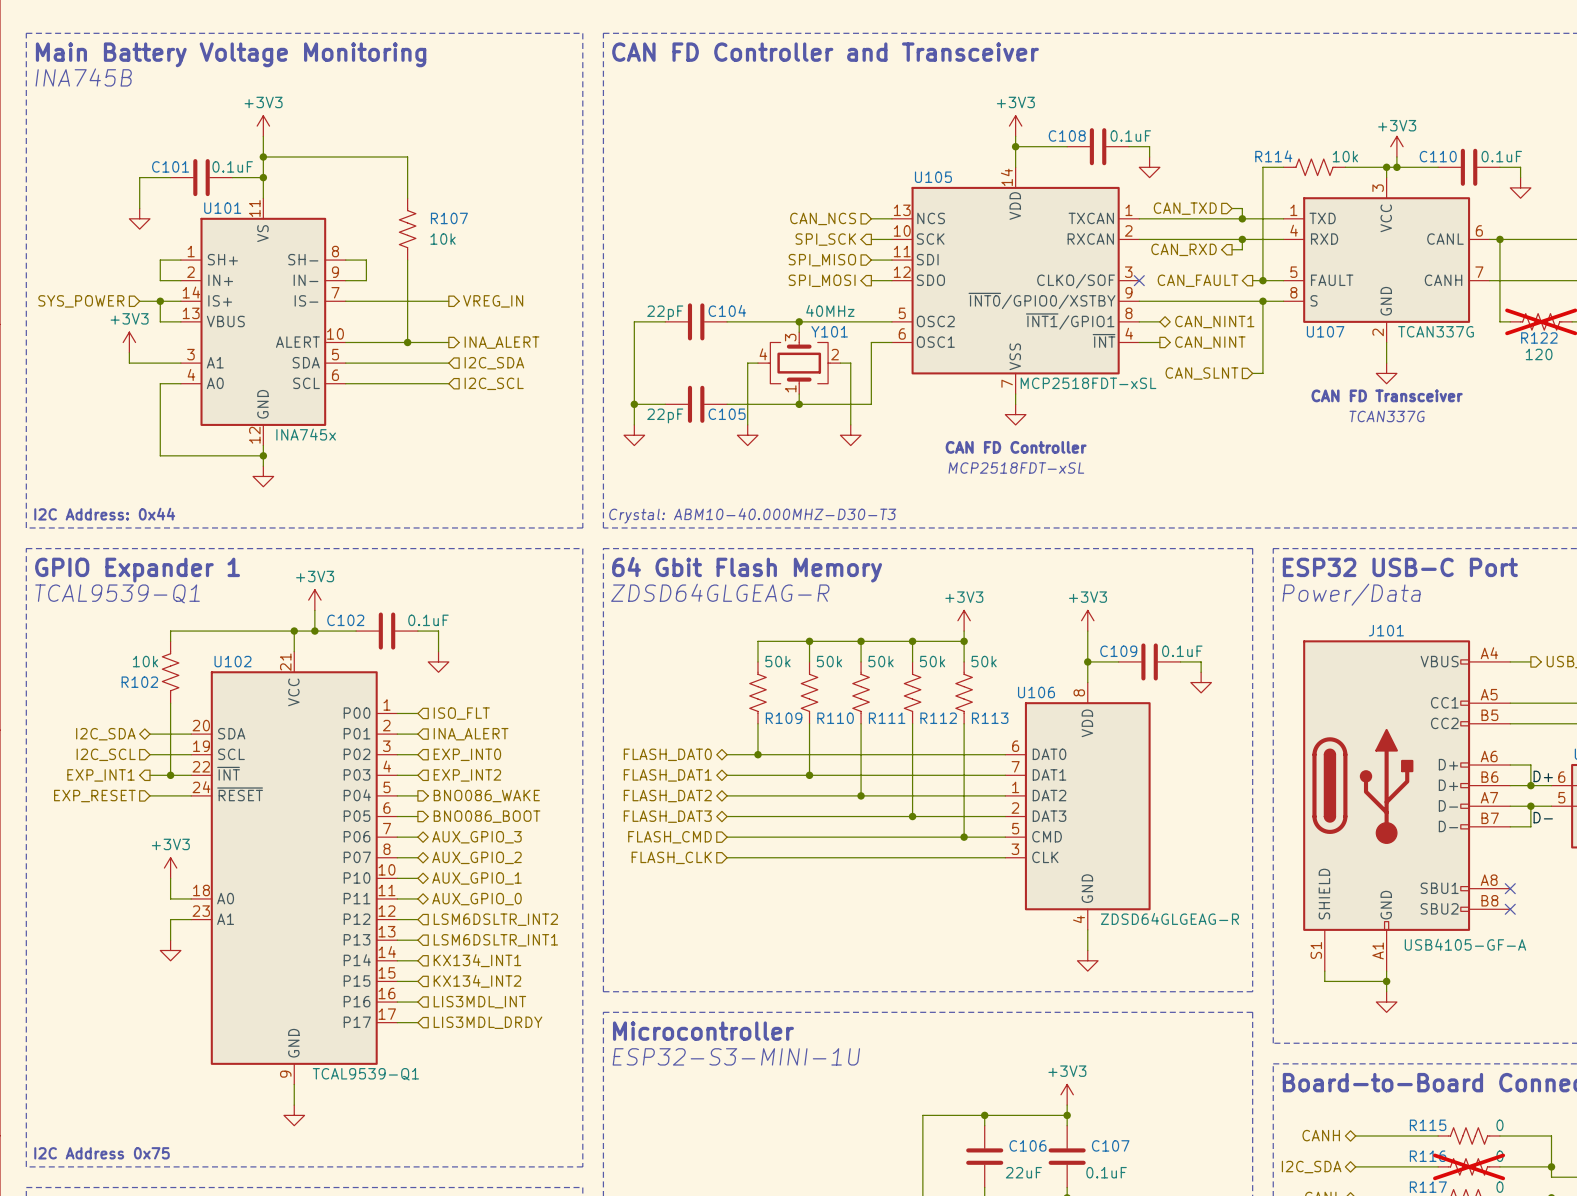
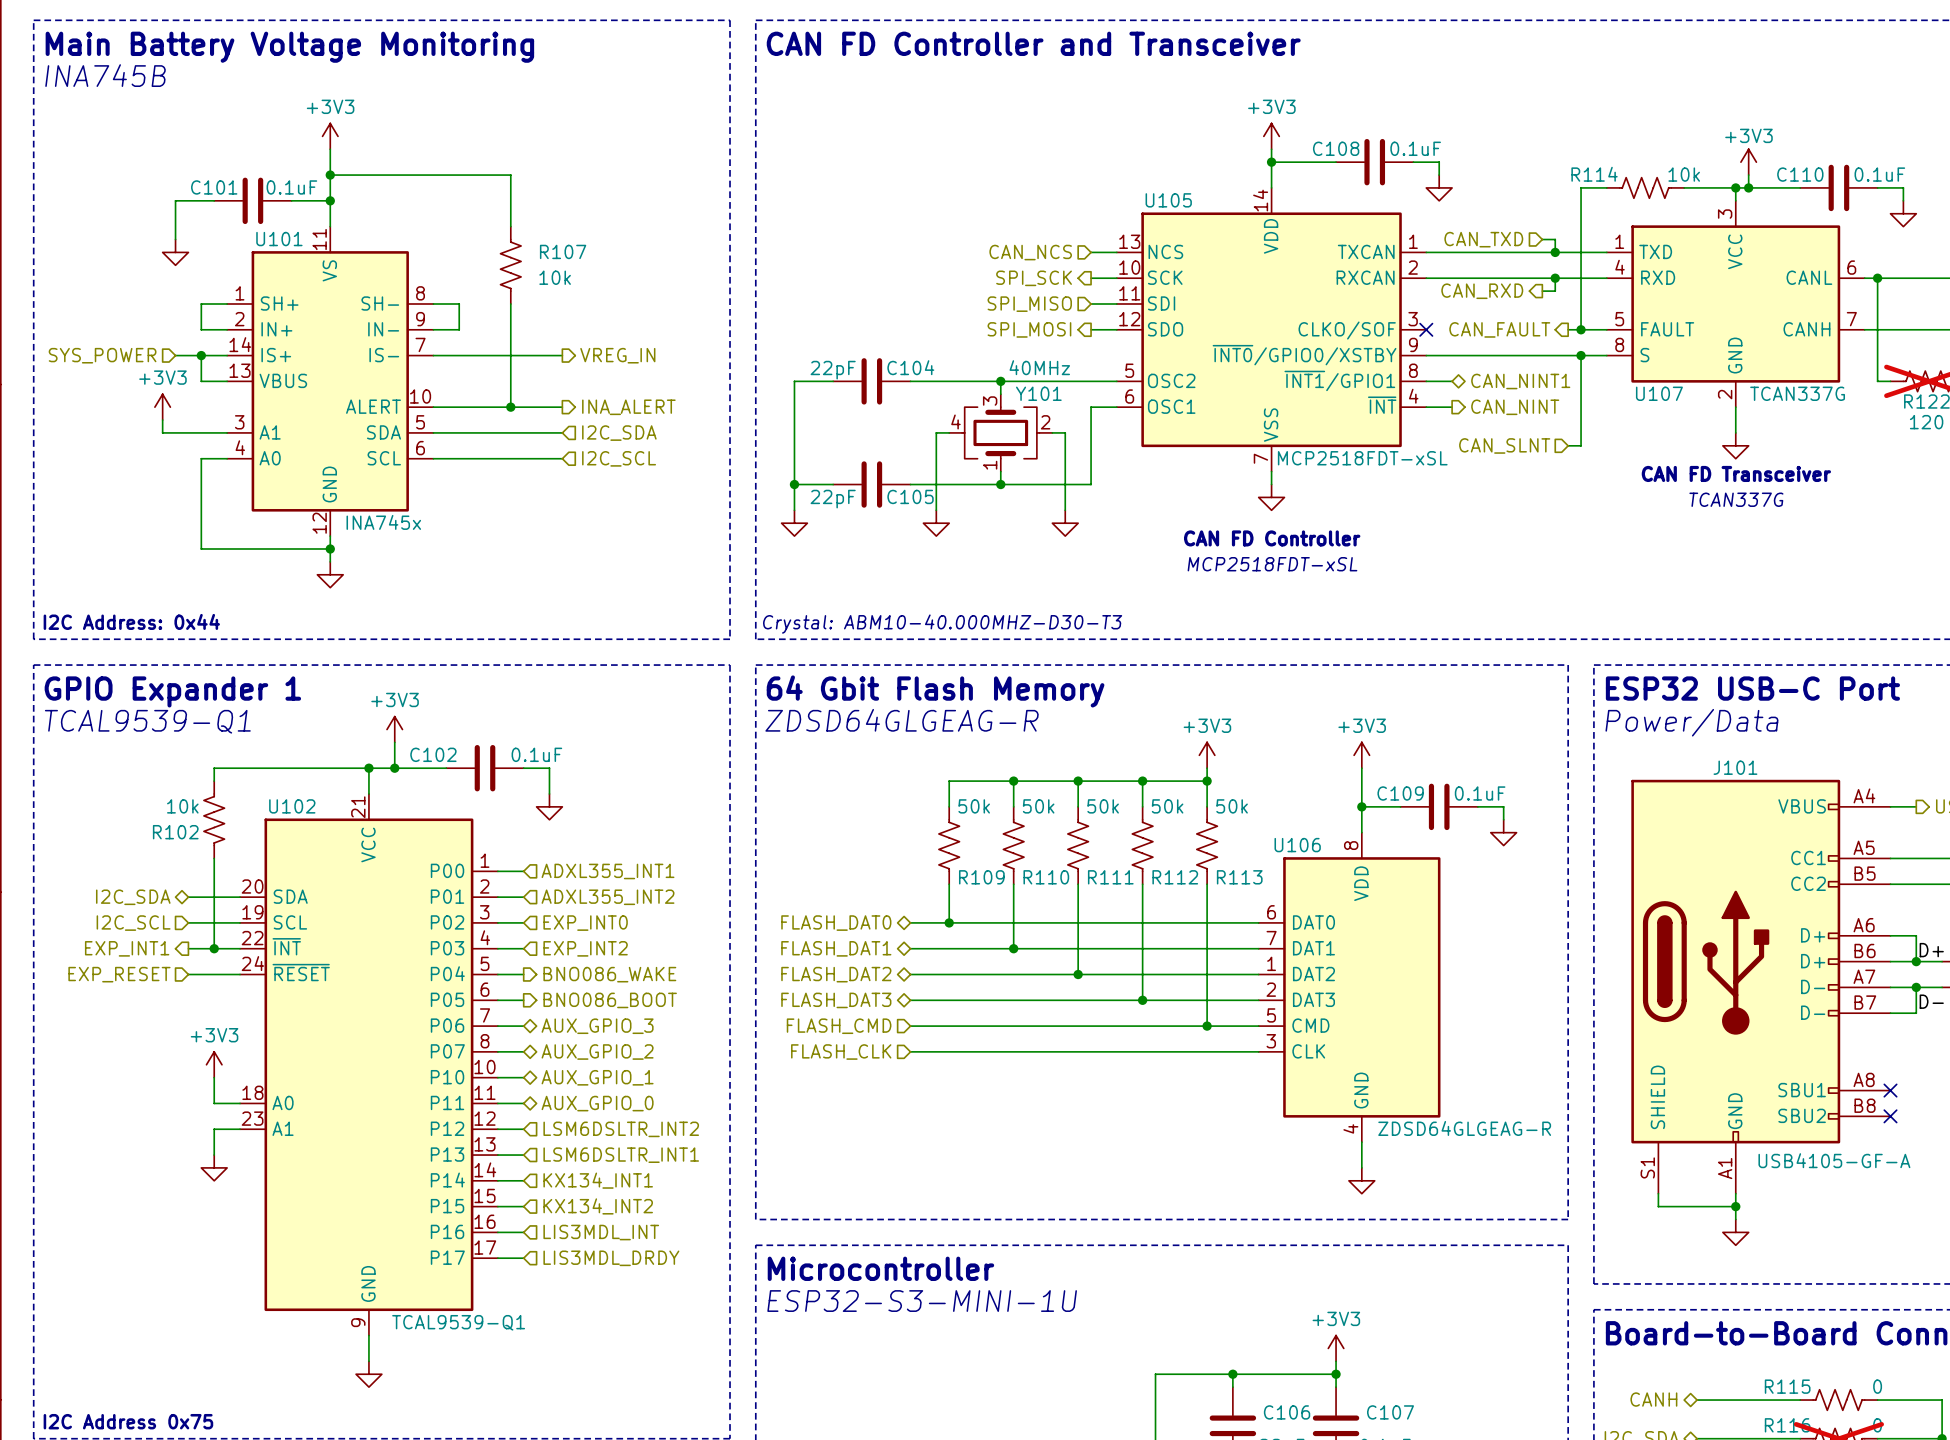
hierarchical label: ISO_FLT (461, 713) -> ADXL355_INT1 (608, 871)
hierarchical label: INA_ALERT (471, 734) -> ADXL355_INT2 (608, 897)

